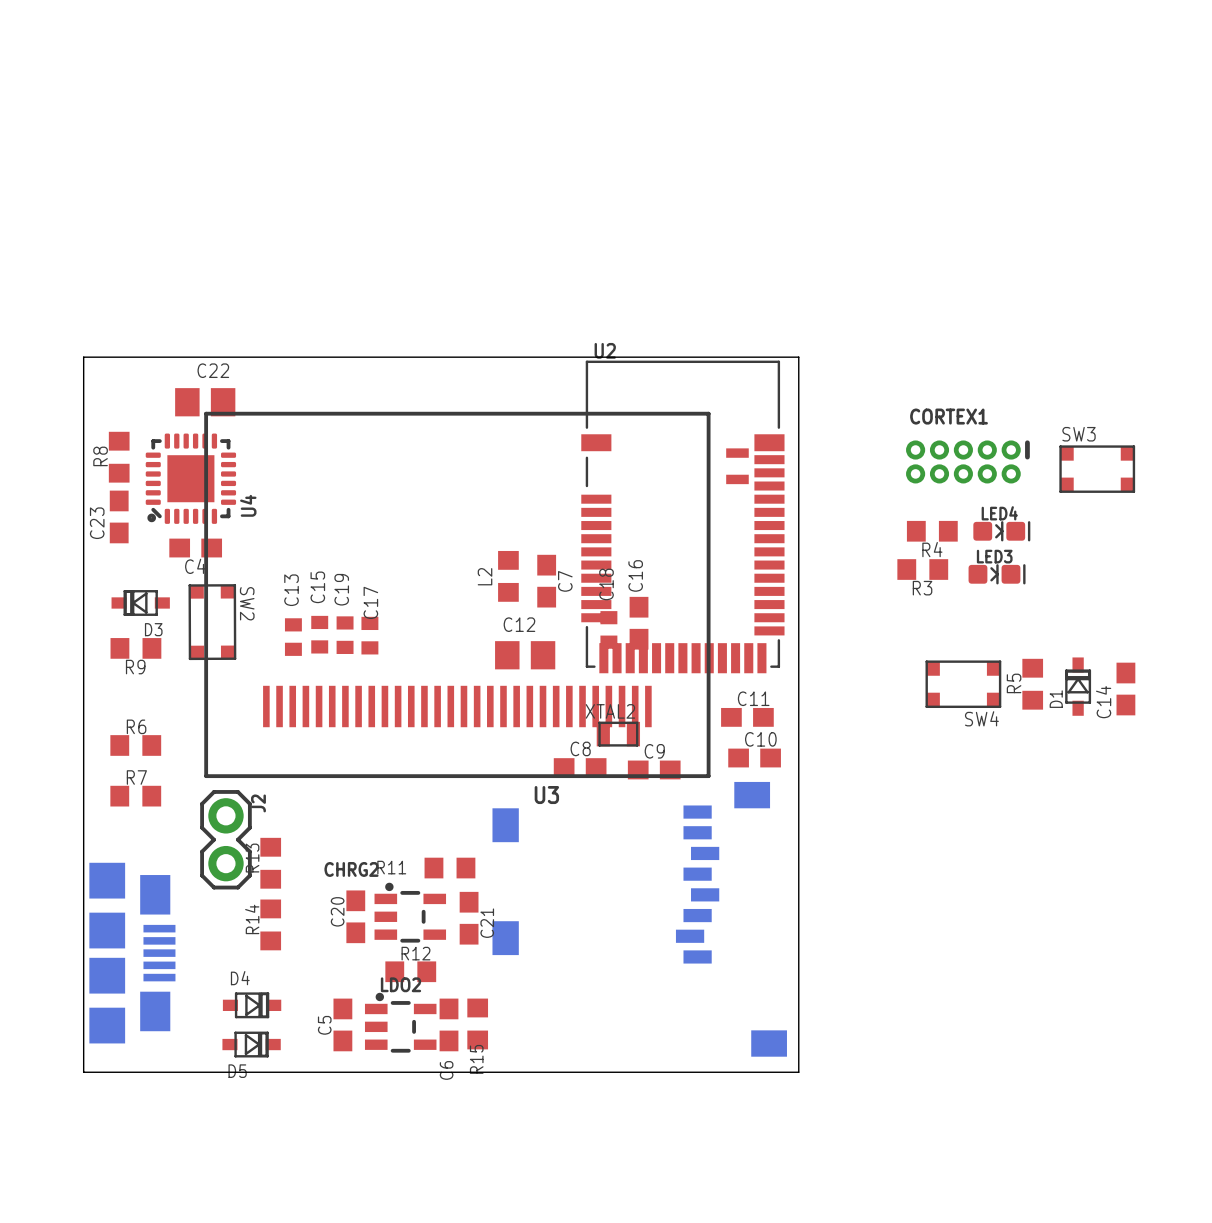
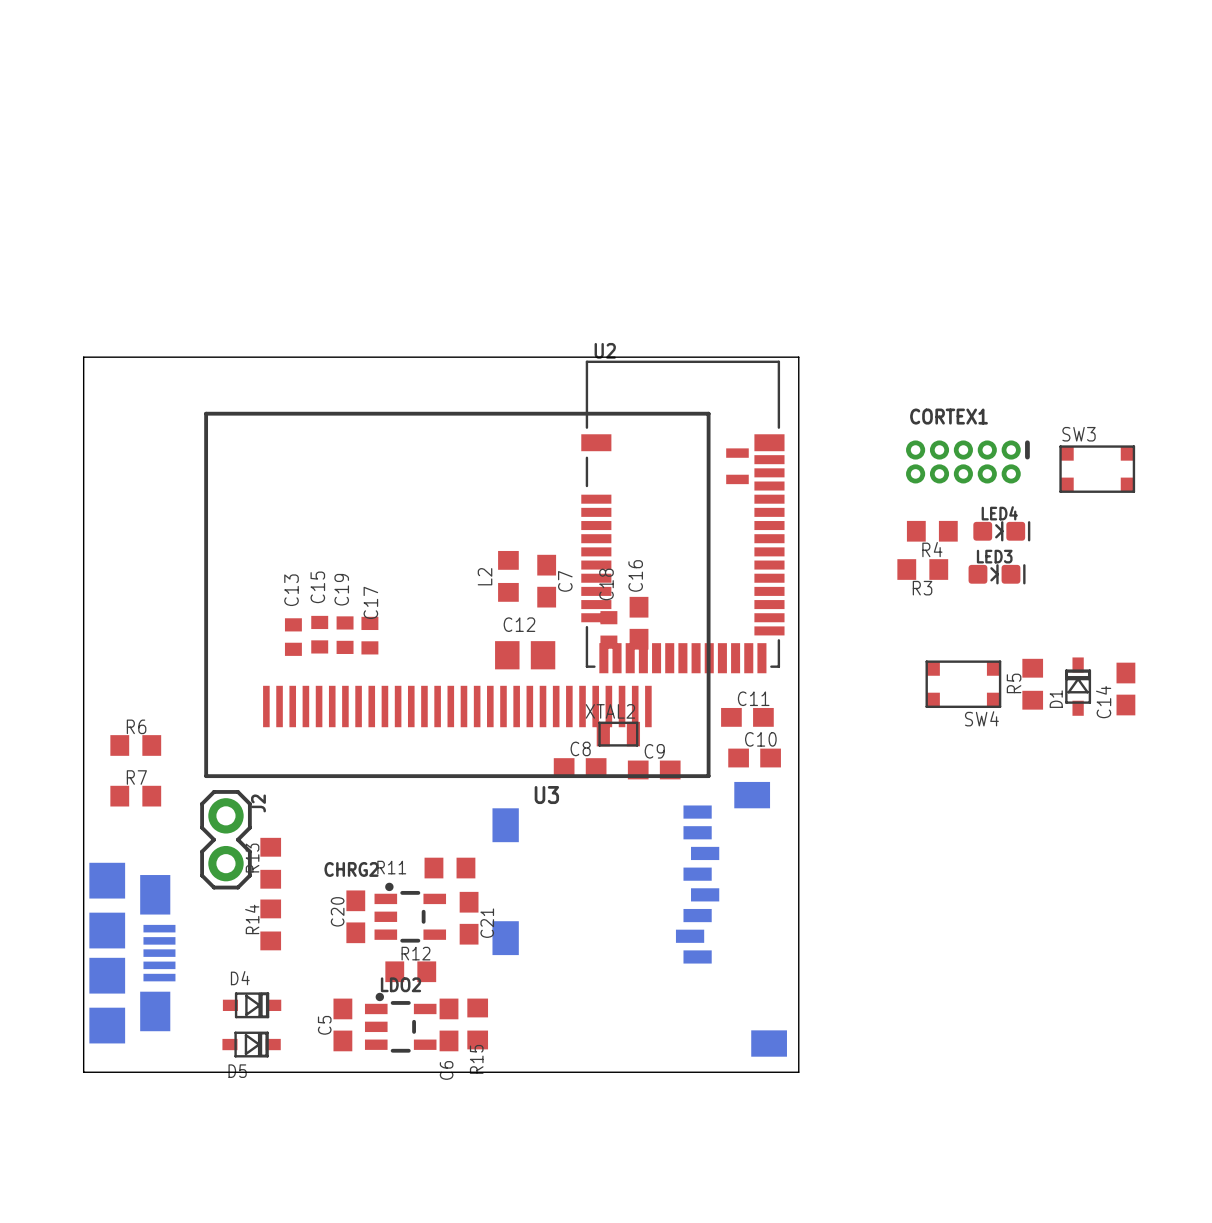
C22: (205, 402) -> none
R8: (119, 457) -> none
U4: (190, 478) -> none
C23: (119, 516) -> none
C4: (195, 548) -> none
D3: (140, 602) -> none
SW2: (212, 622) -> none
R9: (135, 648) -> none

